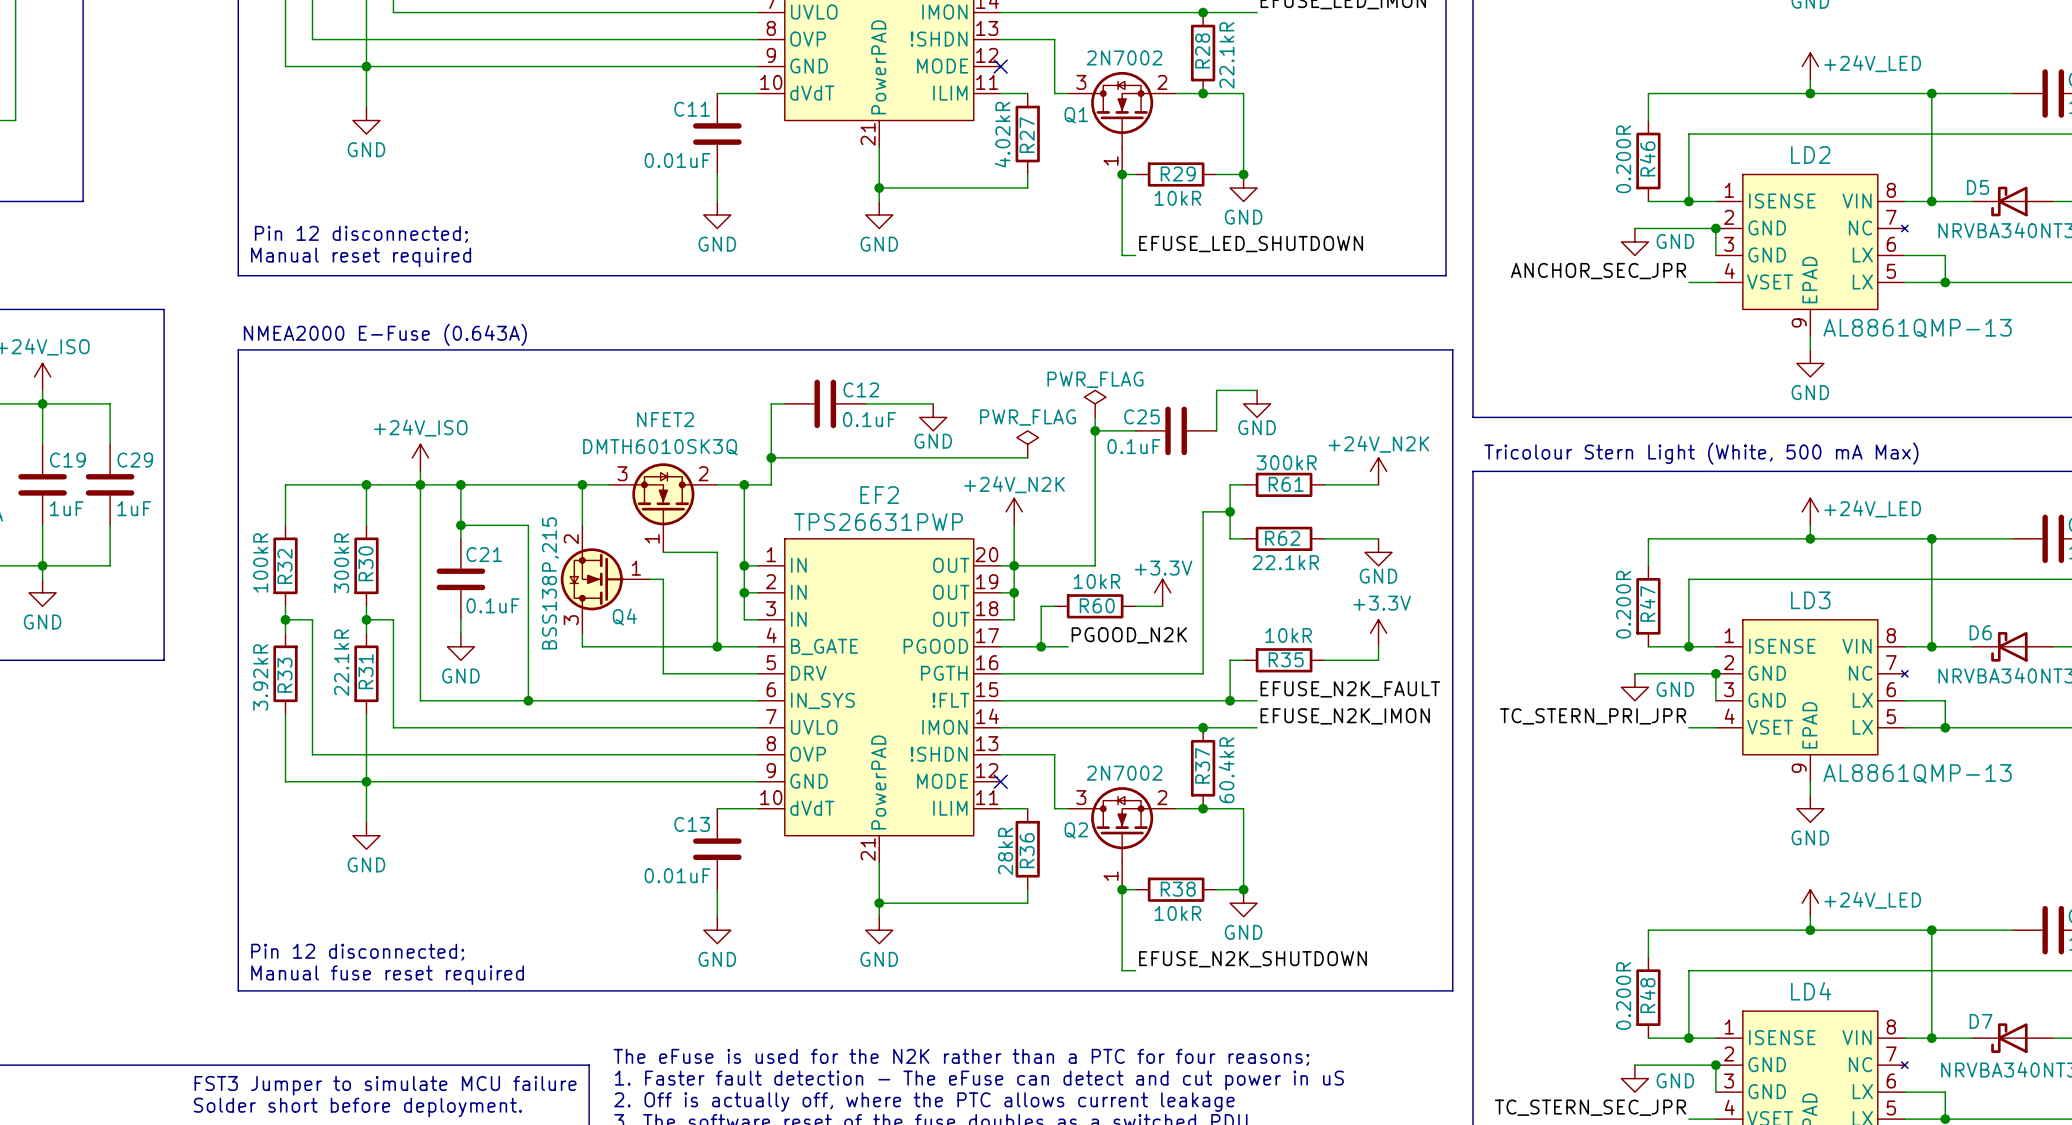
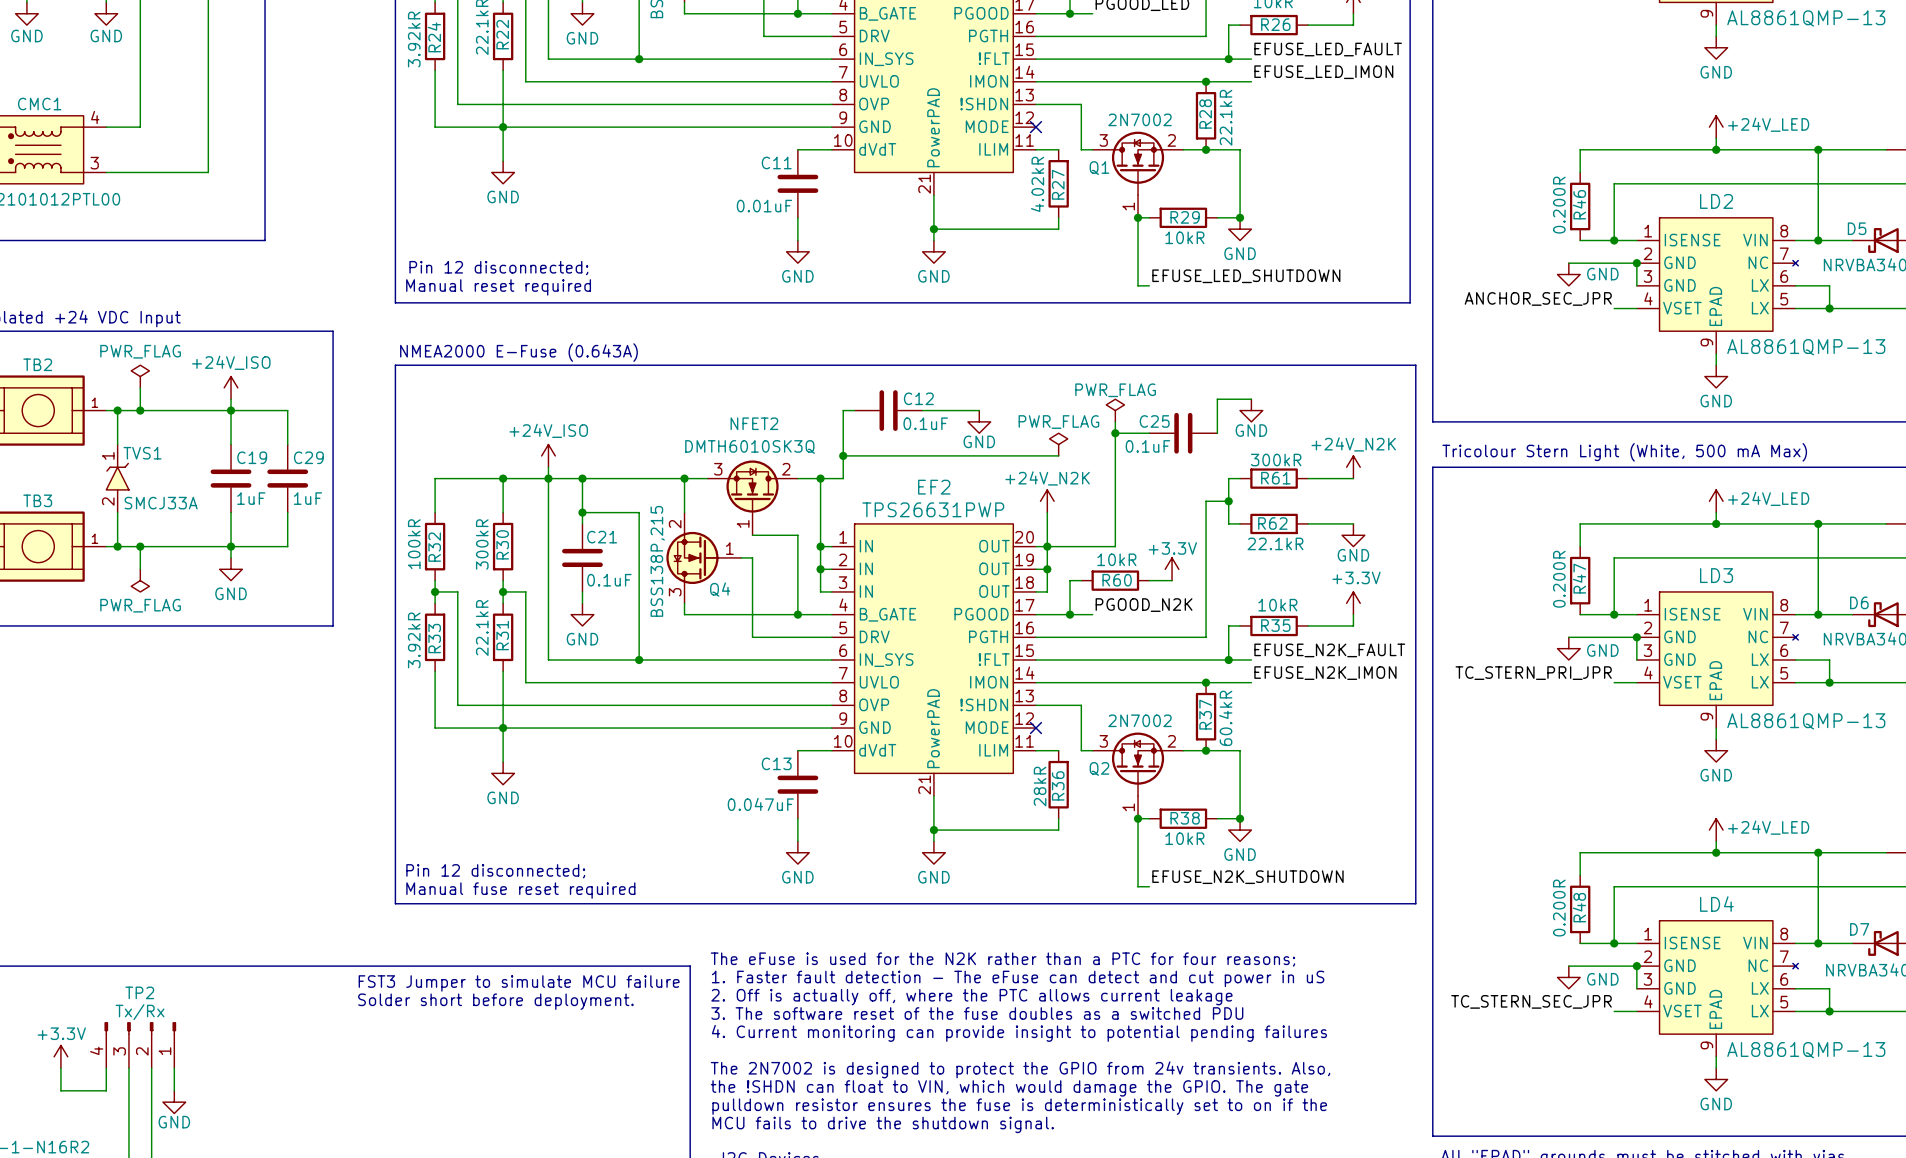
C13 value: 0.01uF (677, 875) -> 0.047uF (760, 804)

